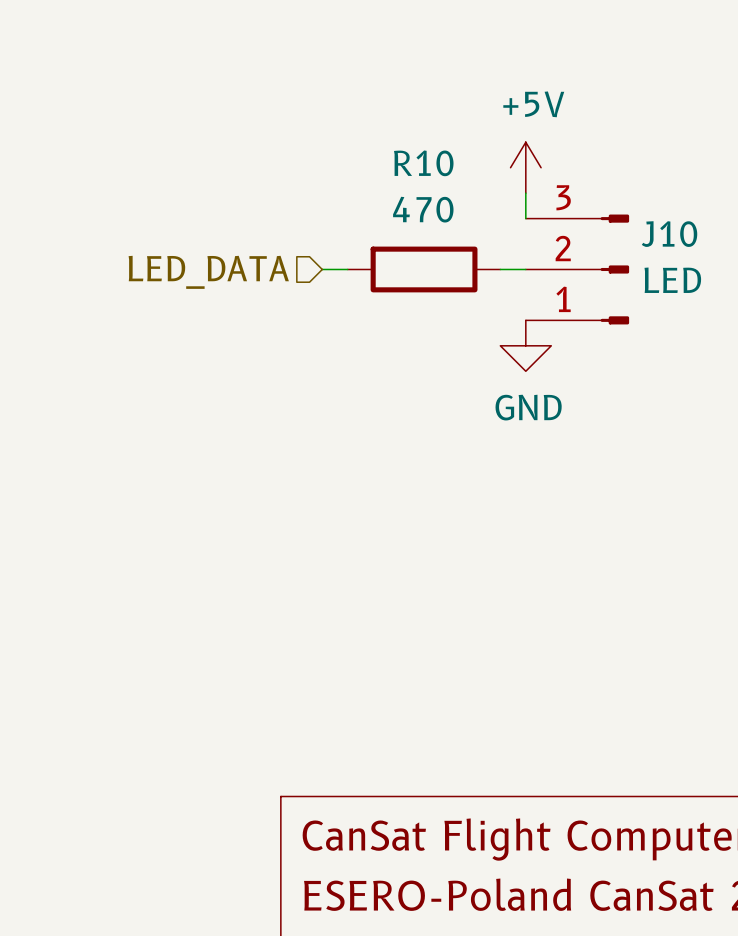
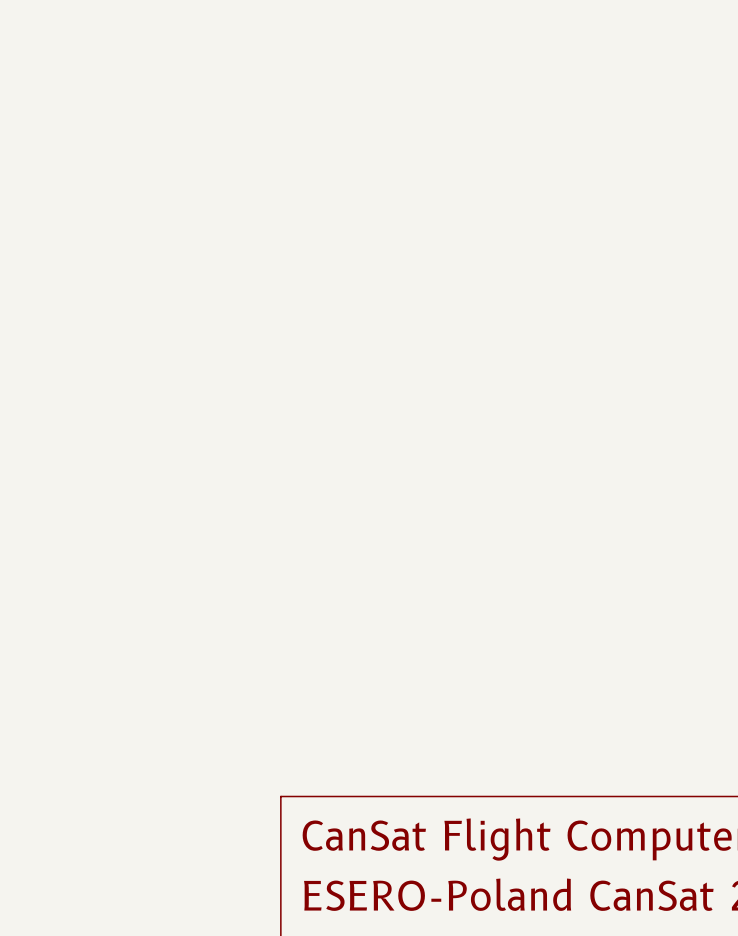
power symbol: +5V (525, 167) -> none
wire: (525, 193) (525, 218) -> none
wire: (322, 269) (347, 269) -> none
R10: 470 (424, 269) -> none
wire: (500, 269) (525, 269) -> none
J10: LED (577, 269) -> none
hierarchical label: LED_DATA (208, 272) -> none
power symbol: GND (525, 345) -> none

